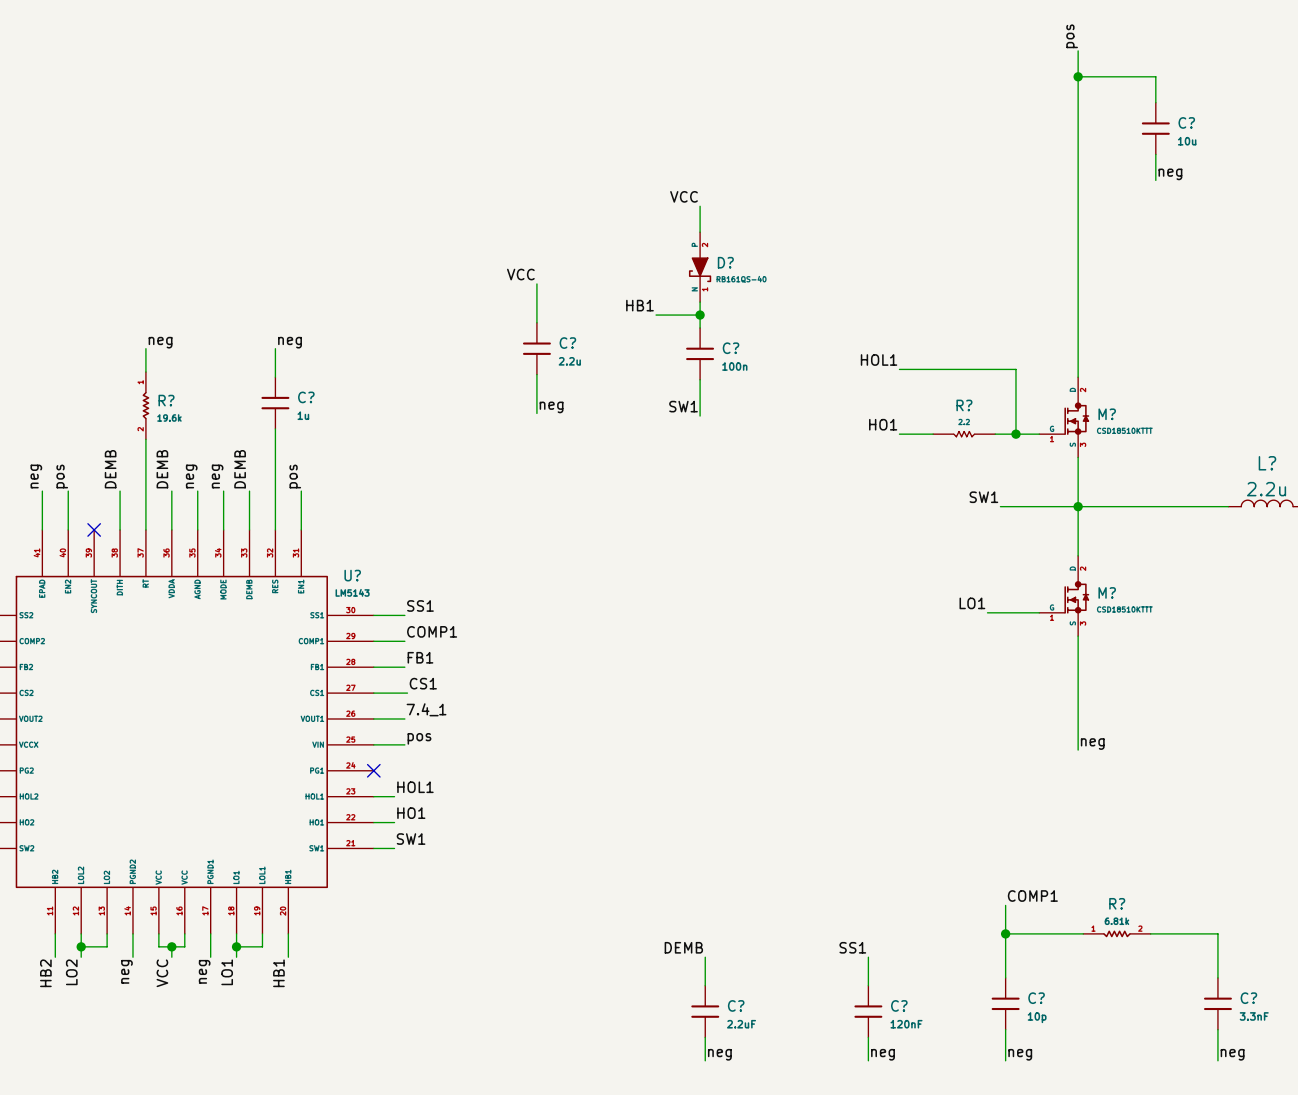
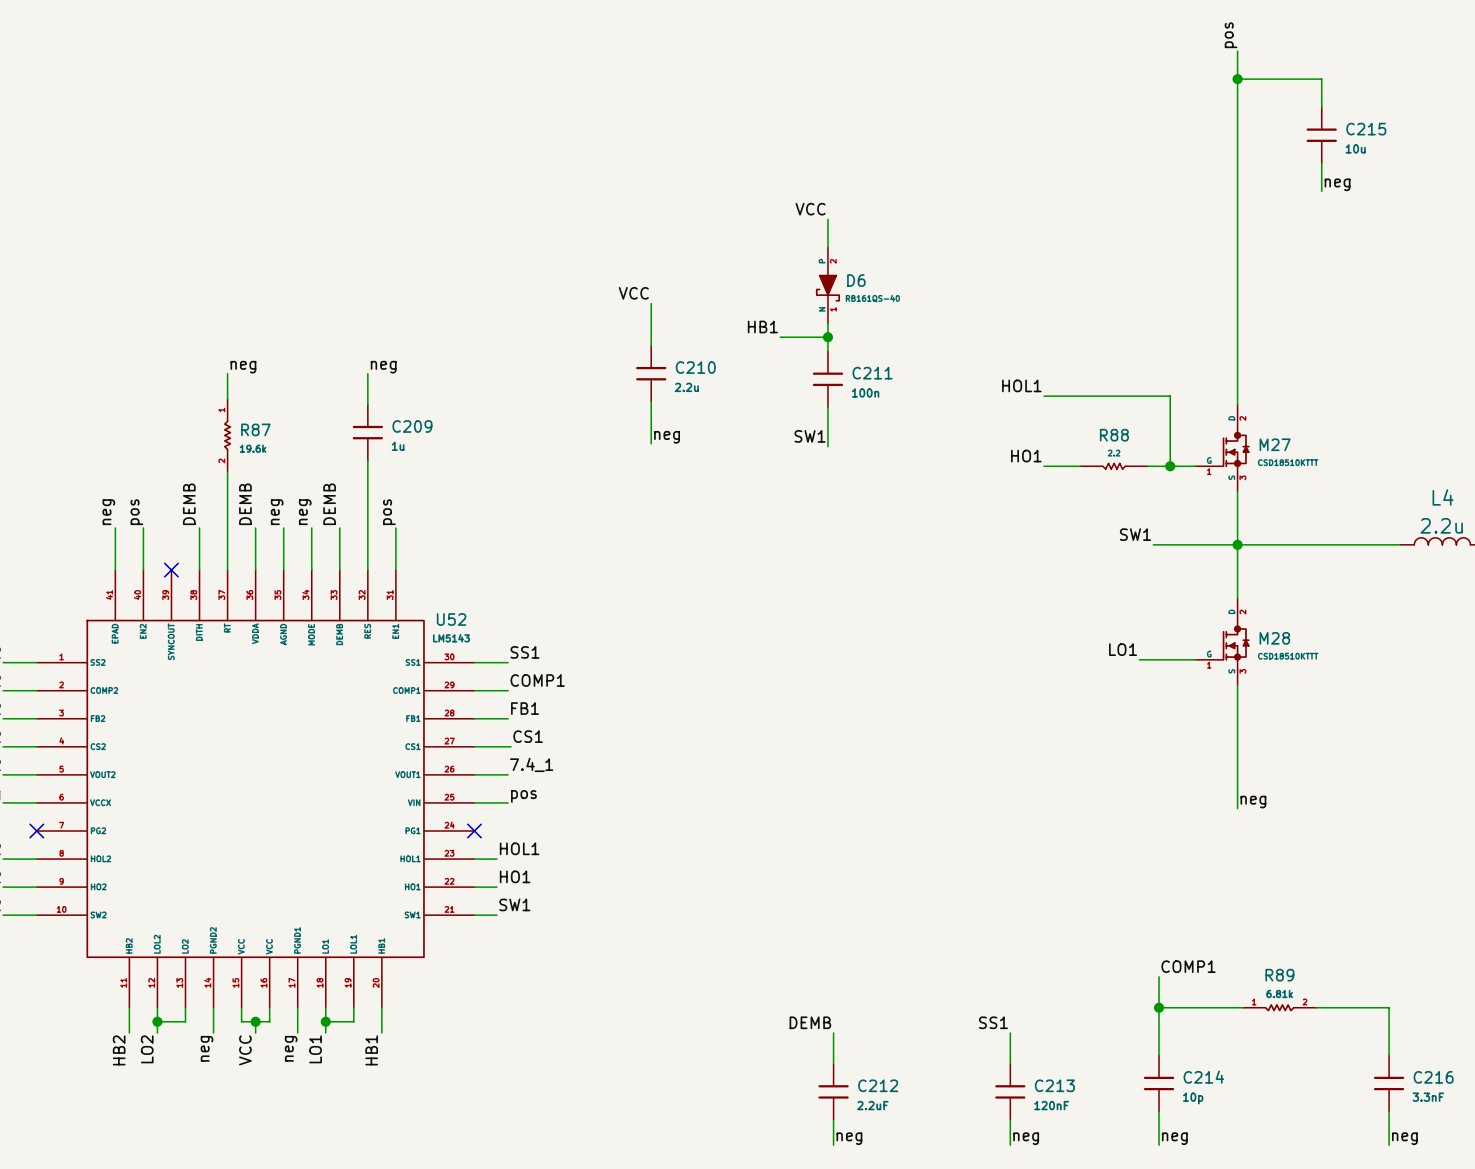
C? name: C? (1186, 122) -> C215 (1366, 129)
D? name: D? (725, 262) -> D6 (856, 280)
C? name: C? (567, 343) -> C210 (695, 367)
C? name: C? (731, 348) -> C211 (872, 373)
C? name: C? (306, 397) -> C209 (412, 426)
R? name: R? (166, 400) -> R87 (255, 429)
R? name: R? (964, 405) -> R88 (1114, 435)
M? name: M? (1107, 414) -> M27 (1275, 444)
L? name: L? (1267, 463) -> L4 (1443, 497)
U? name: U? (352, 575) -> U52 (451, 619)
M? name: M? (1107, 592) -> M28 (1274, 638)
R? name: R? (1117, 903) -> R89 (1279, 975)
C? name: C? (1036, 998) -> C214 (1203, 1077)
C? name: C? (1248, 998) -> C216 (1433, 1077)
C? name: C? (736, 1005) -> C212 (878, 1085)
C? name: C? (899, 1005) -> C213 (1054, 1085)

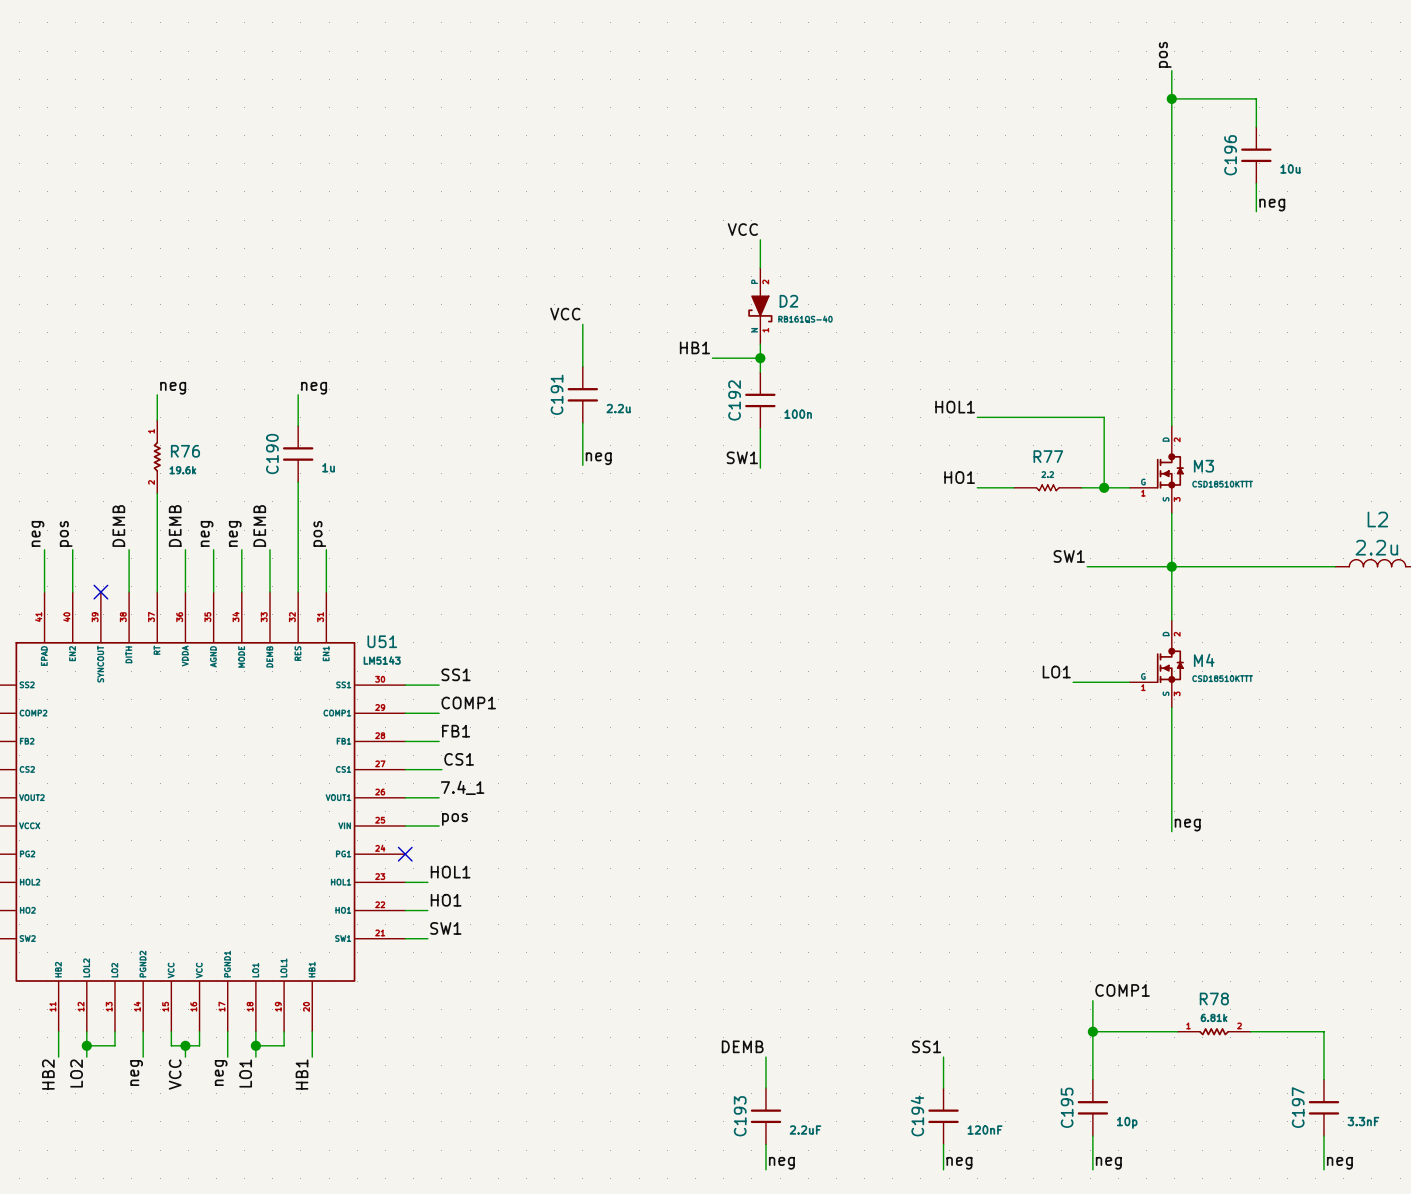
C215 name: C215 (1366, 129) -> C196 (1230, 155)
D6 name: D6 (856, 280) -> D2 (788, 301)
C210 name: C210 (695, 367) -> C191 (557, 394)
C211 name: C211 (872, 373) -> C192 (734, 400)
C209 name: C209 (412, 426) -> C190 (272, 454)
R87 name: R87 (255, 429) -> R76 (185, 451)
R88 name: R88 (1114, 435) -> R77 (1048, 456)
M27 name: M27 (1275, 444) -> M3 (1203, 466)
L4 name: L4 (1443, 497) -> L2 (1377, 519)
U52 name: U52 (451, 619) -> U51 (382, 641)
M28 name: M28 (1274, 638) -> M4 (1204, 660)
R89 name: R89 (1279, 975) -> R78 (1214, 998)
C214 name: C214 (1203, 1077) -> C195 (1067, 1107)
C216 name: C216 (1433, 1077) -> C197 (1298, 1107)
C212 name: C212 (878, 1085) -> C193 (740, 1116)
C213 name: C213 (1054, 1085) -> C194 (917, 1116)

